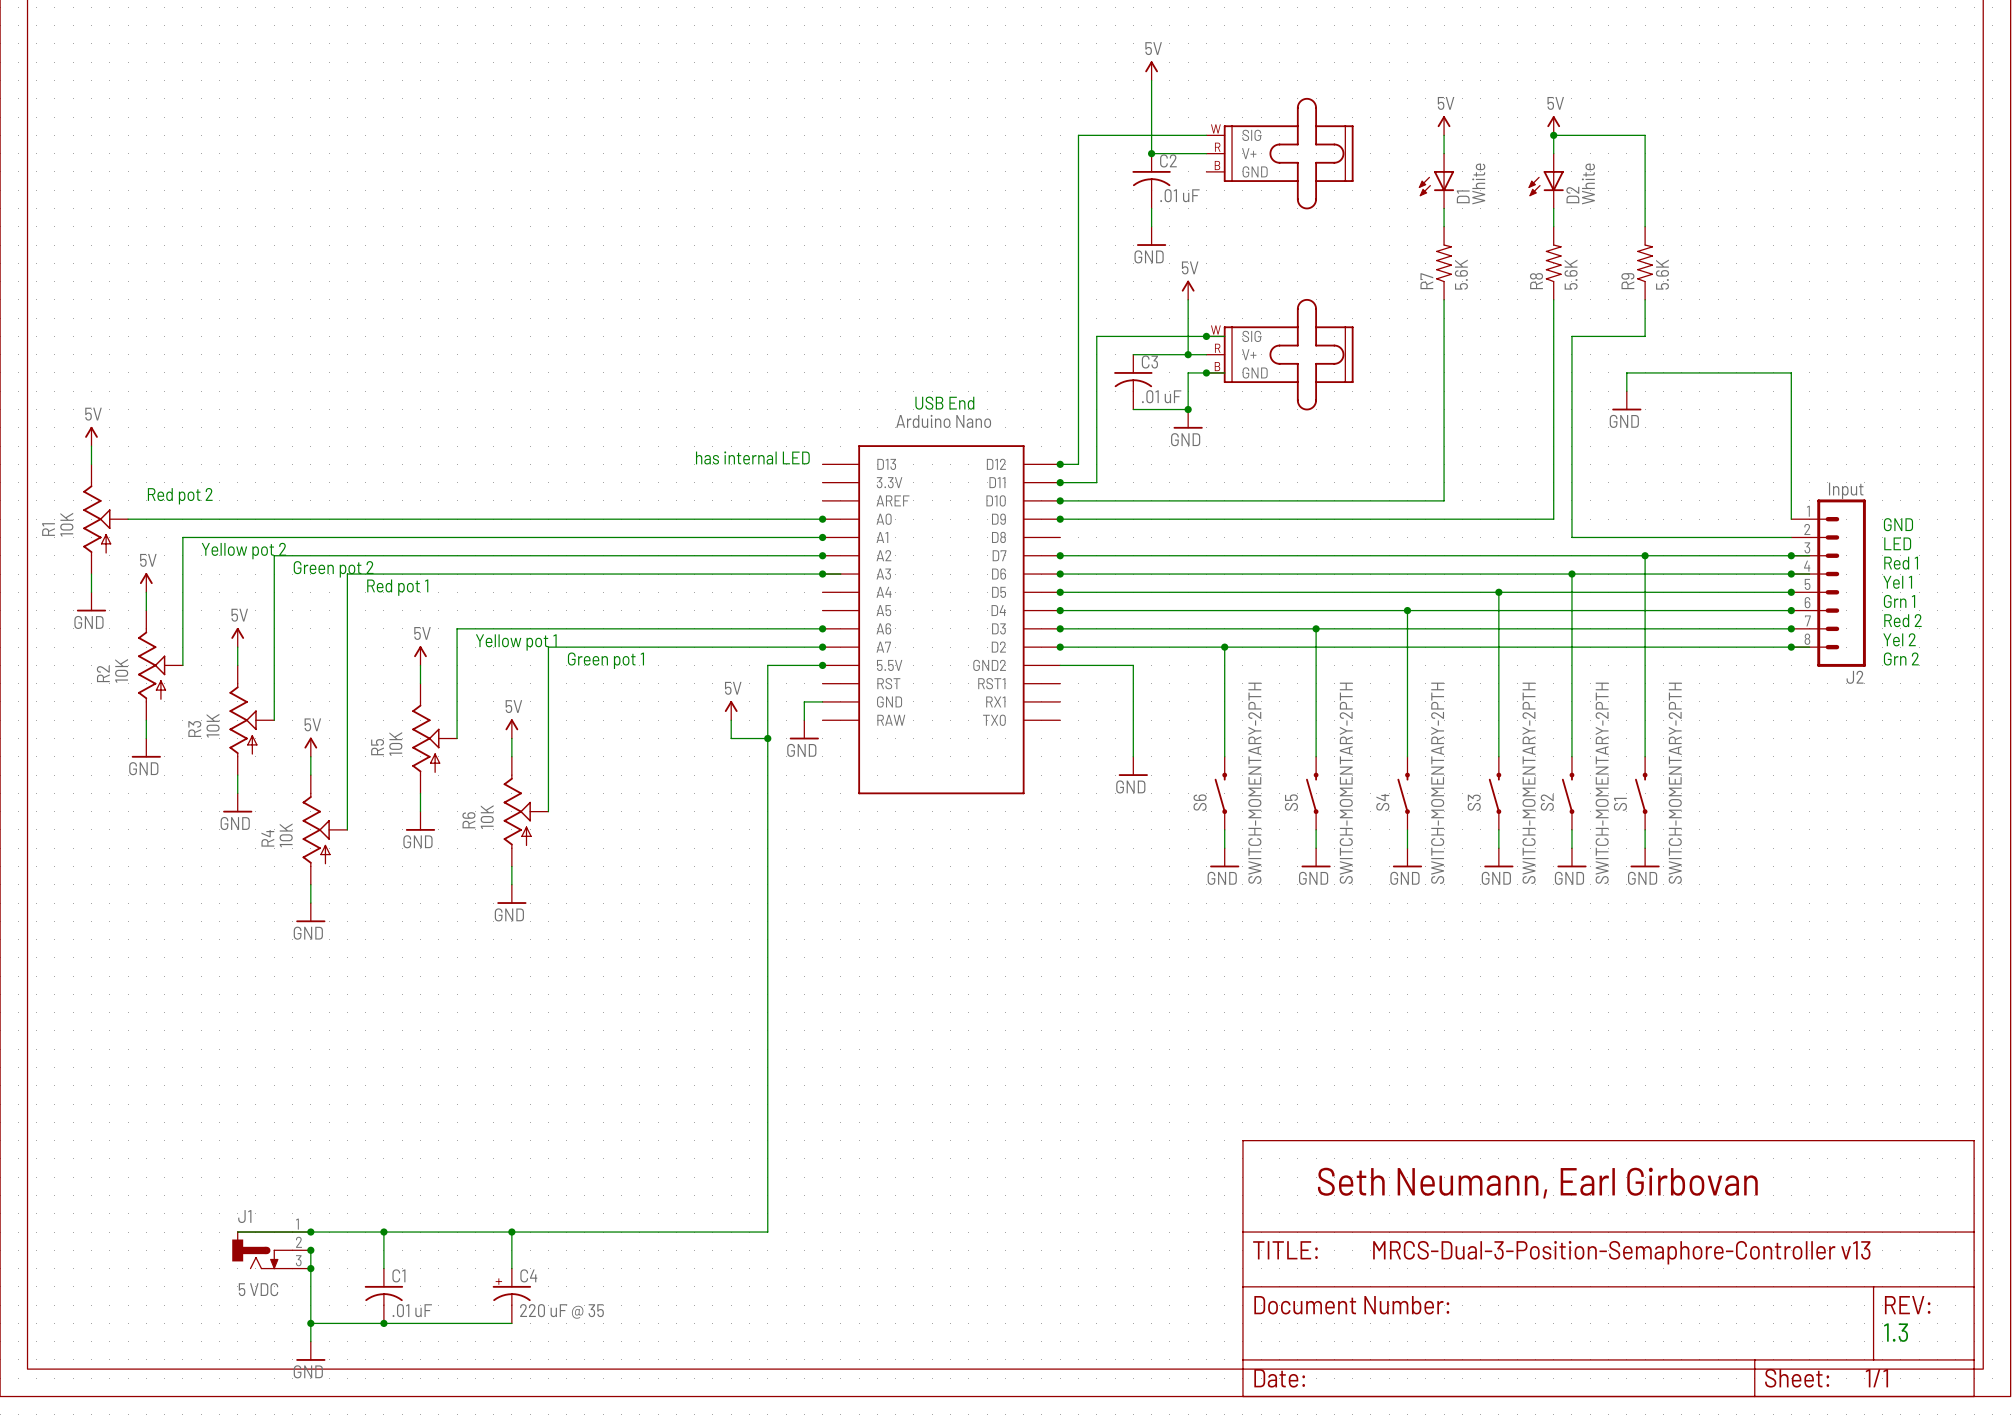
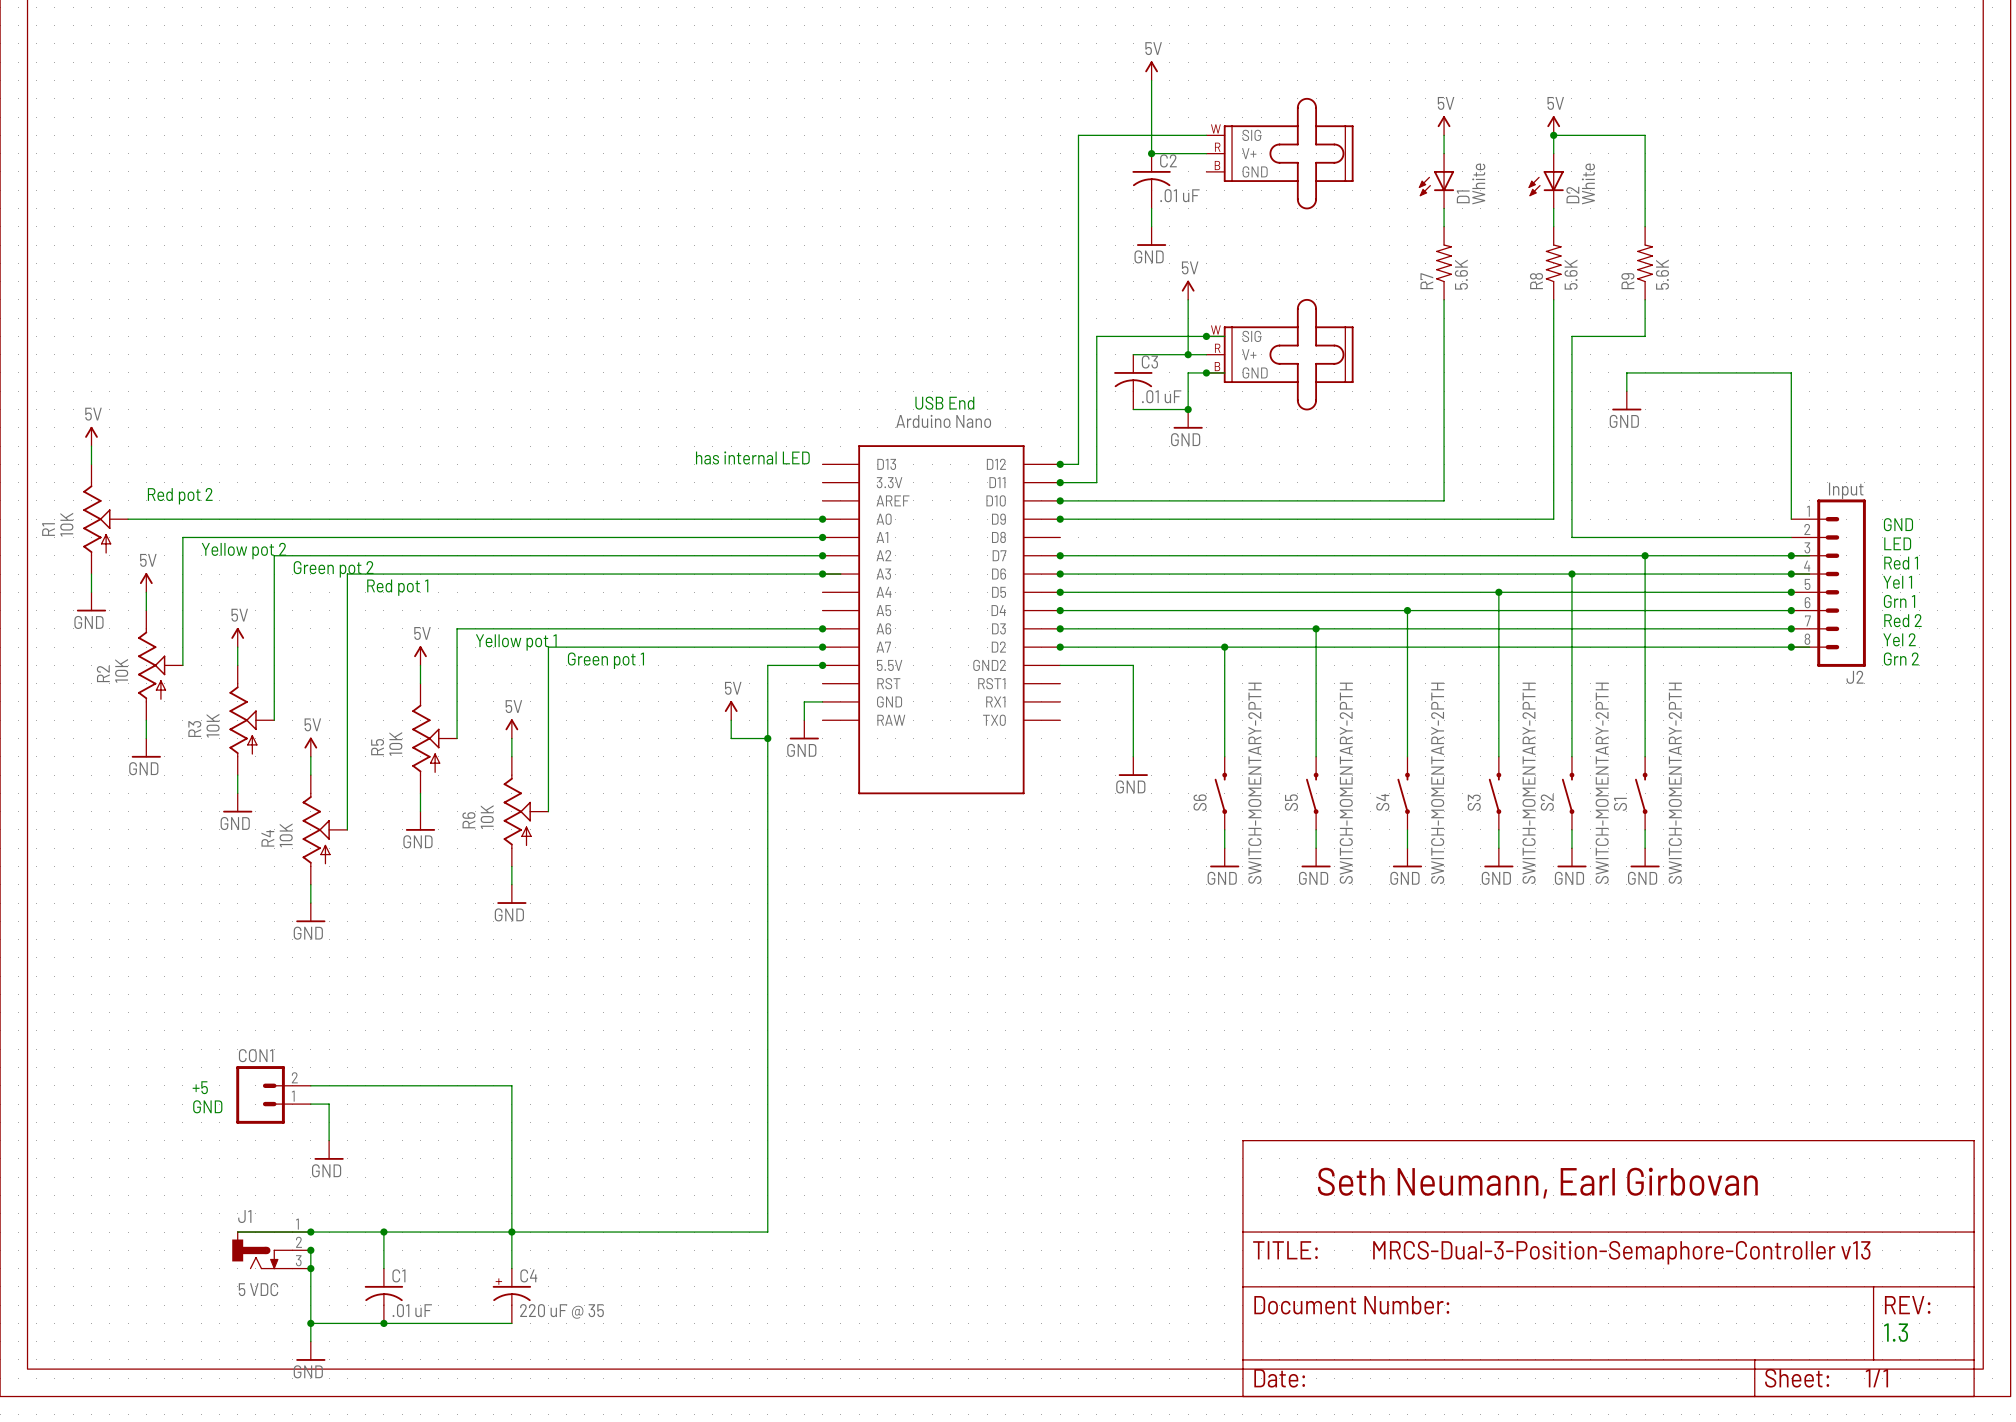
wire: none -> (310, 1085) (511, 1085) (511, 1232)
text: none -> +5 (200, 1087)
CON1: none -> (273, 1094)
wire: none -> (310, 1104) (329, 1104) (329, 1140)
text: none -> GND (207, 1106)
power symbol: none -> GND (329, 1150)

